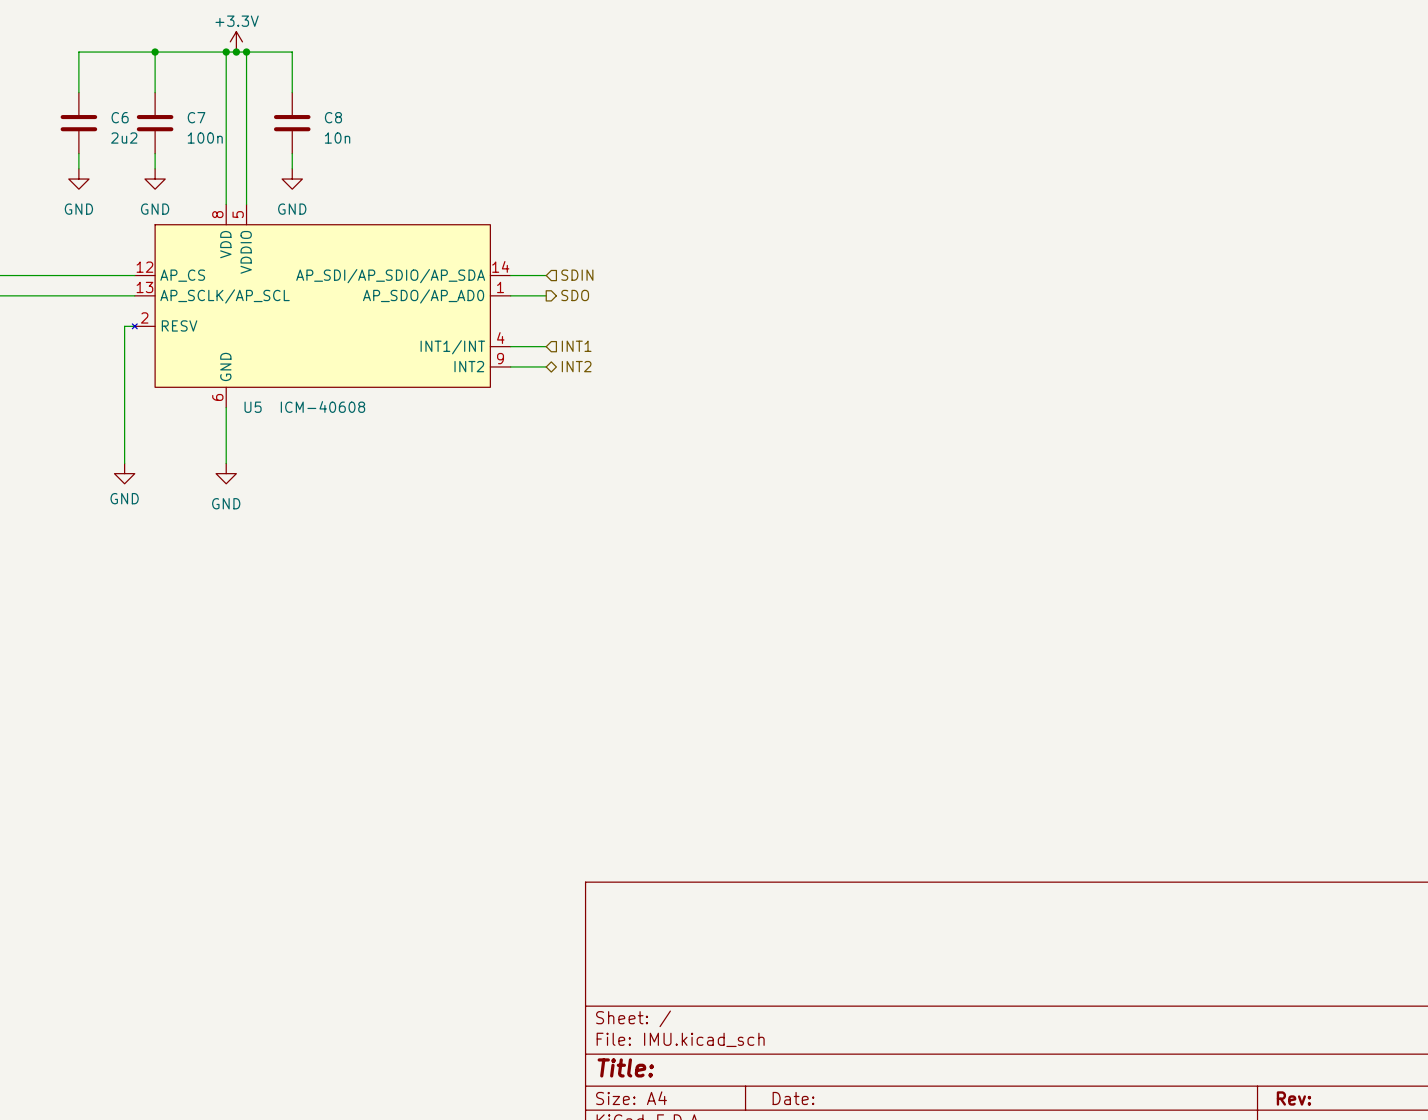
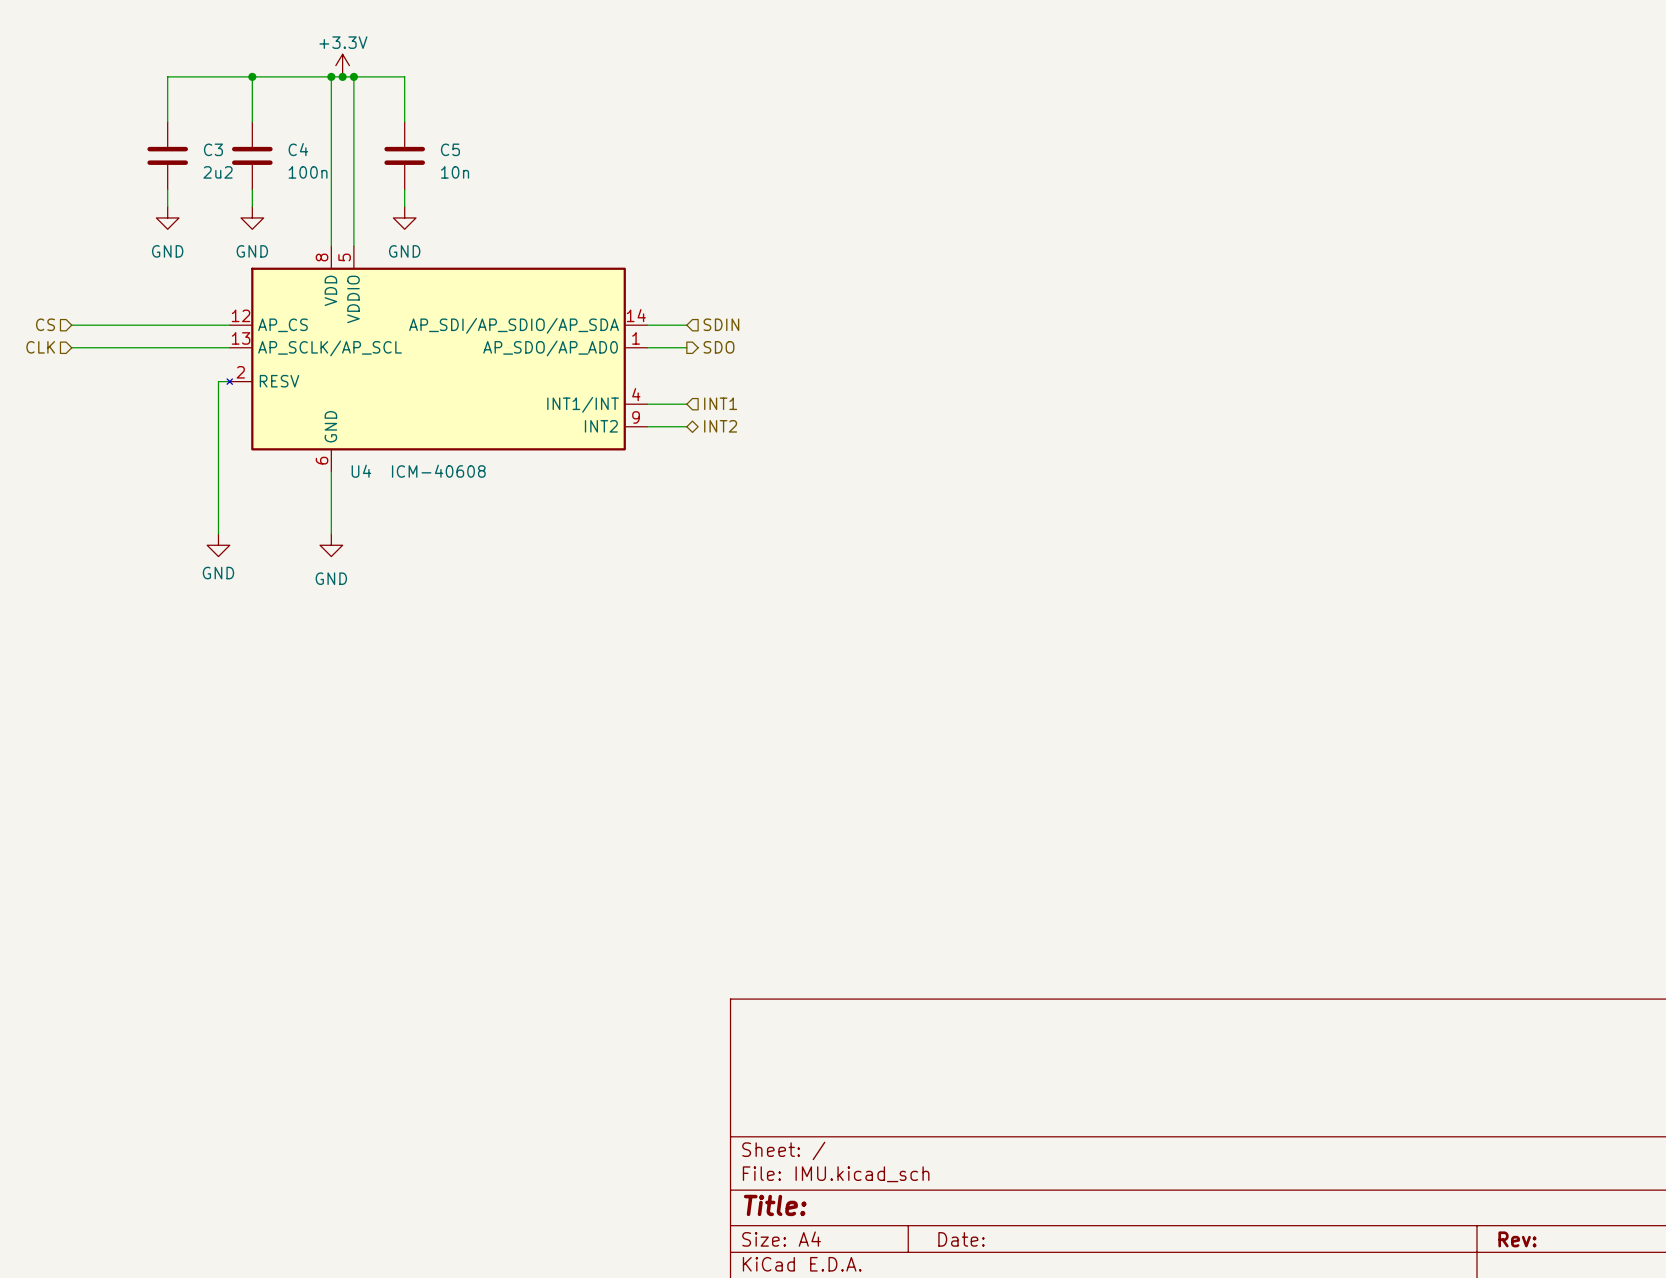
C6 name: C6 (120, 117) -> C3 (213, 149)
C7 name: C7 (196, 117) -> C4 (298, 149)
C8 name: C8 (333, 117) -> C5 (450, 149)
U5: ICM-40608 (321, 306) -> none
U4: none -> ICM-40608 (437, 359)

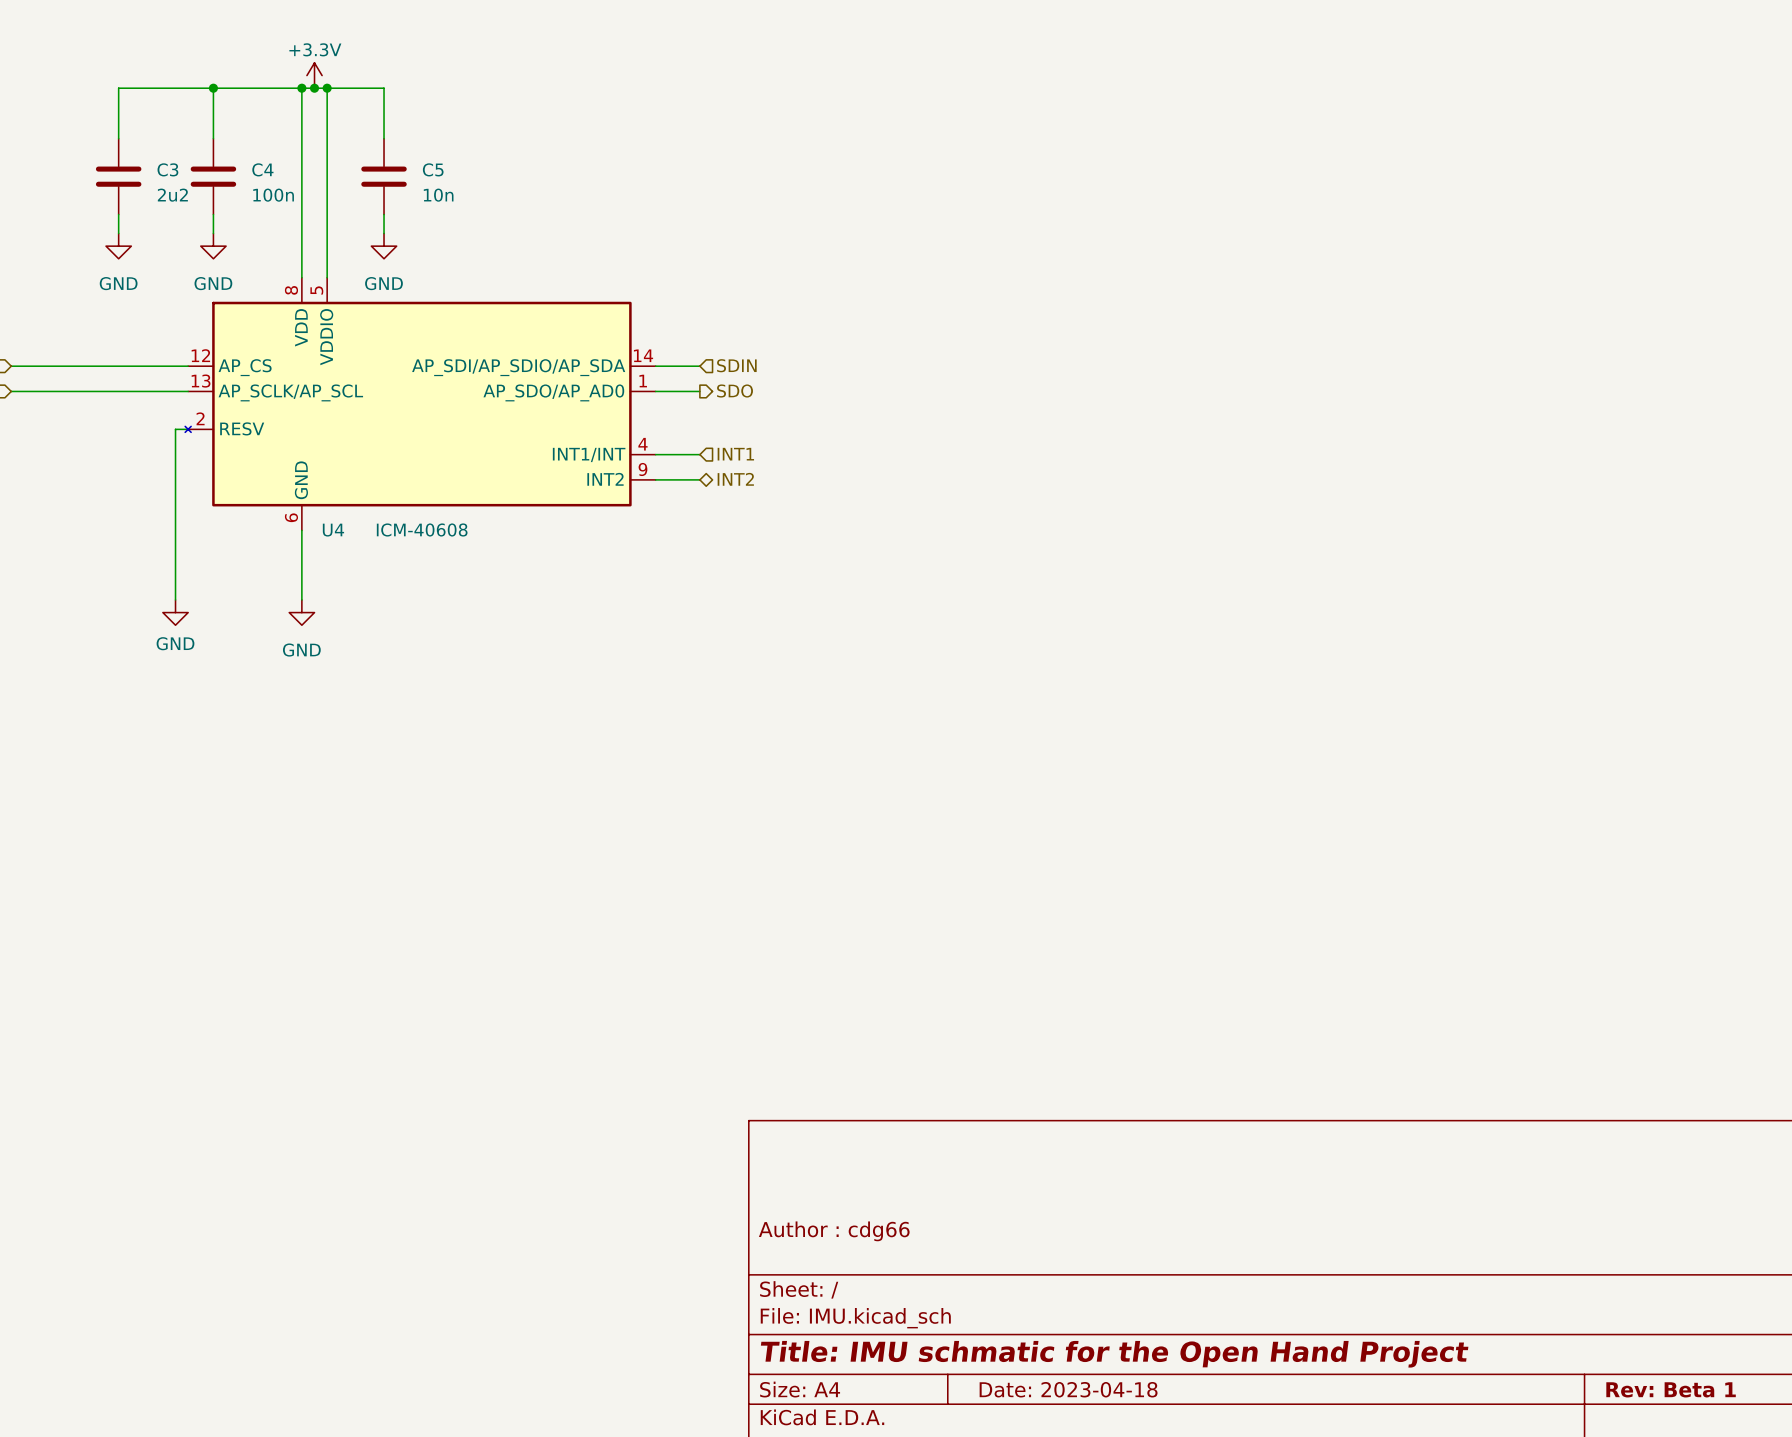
title block: none -> Author : cdg66 (834, 1231)
title block: Title: (775, 1205) -> Title: IMU schmatic for the Open Hand Project (1114, 1354)
title block: Date: (961, 1239) -> Date: 2023-04-18 (1068, 1389)
title block: Rev: (1517, 1239) -> Rev: Beta 1 (1671, 1389)

